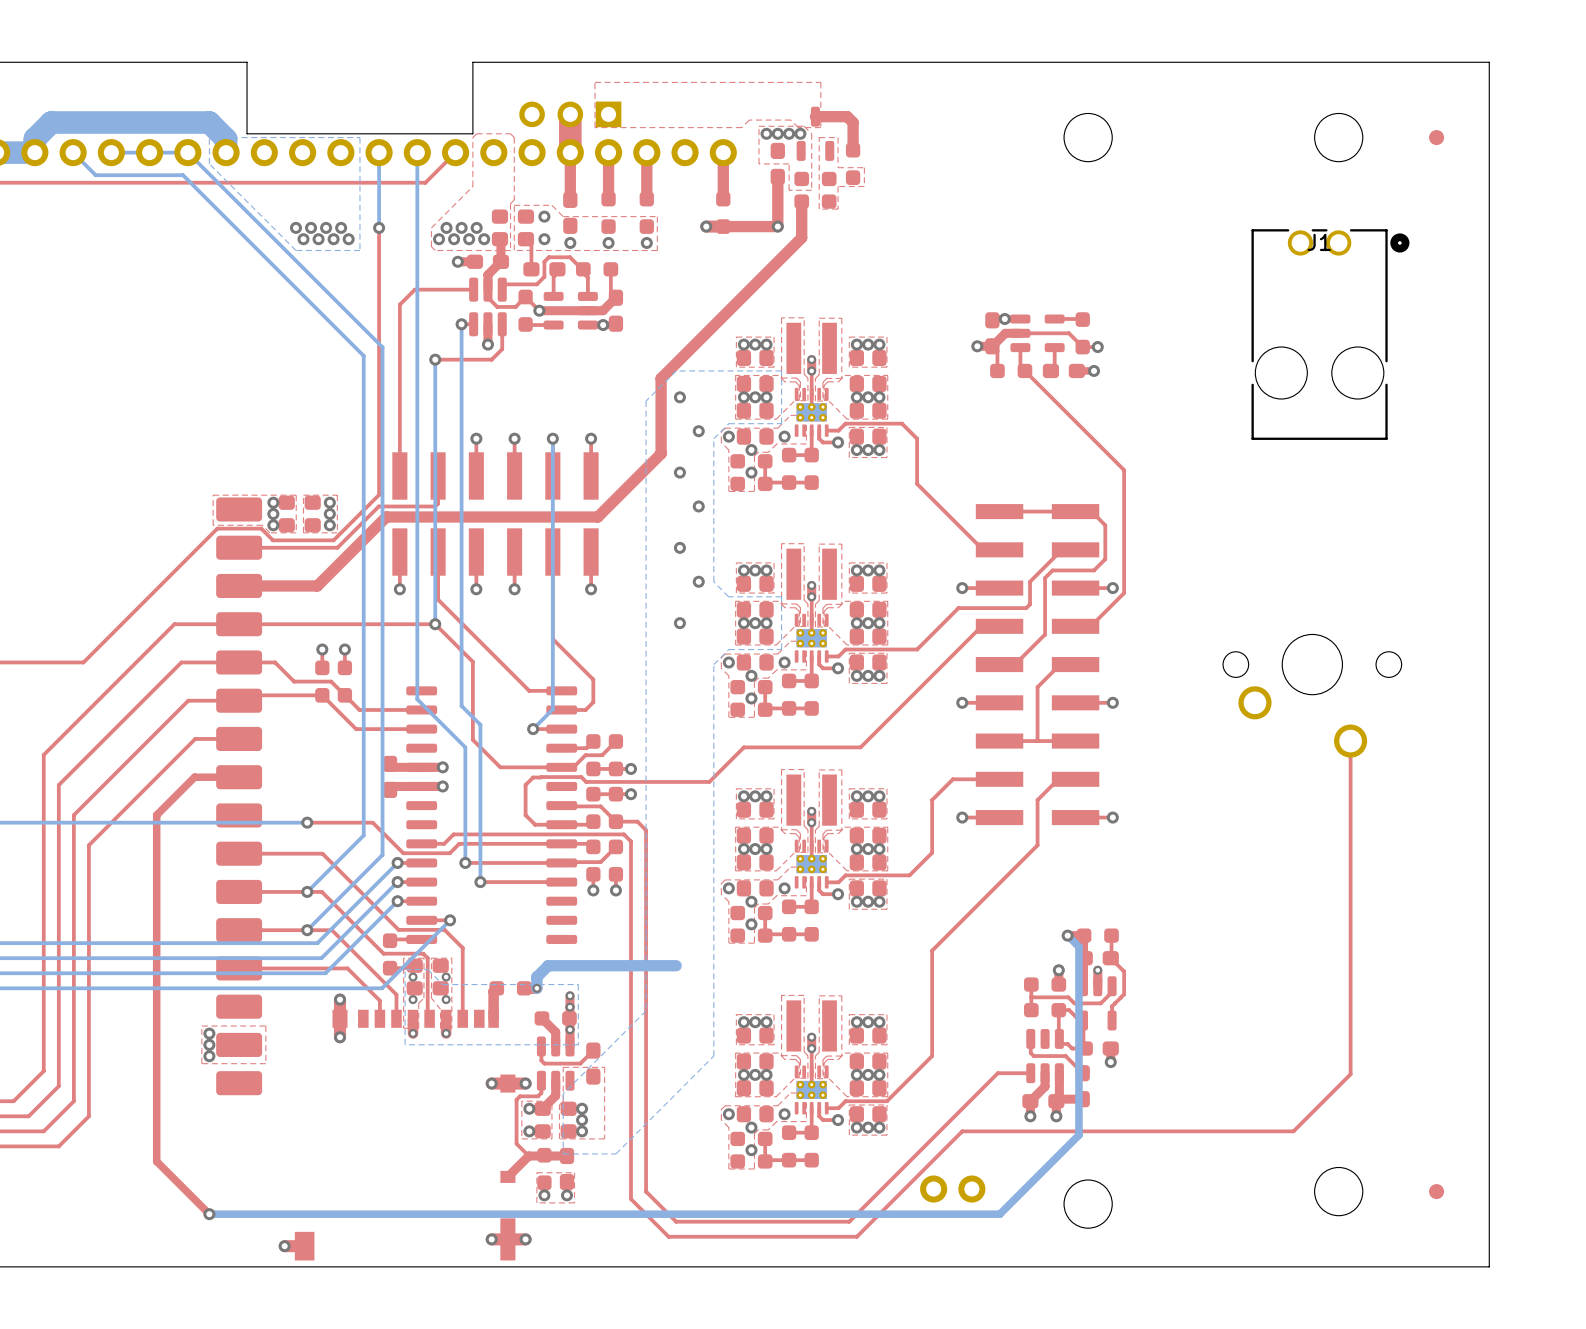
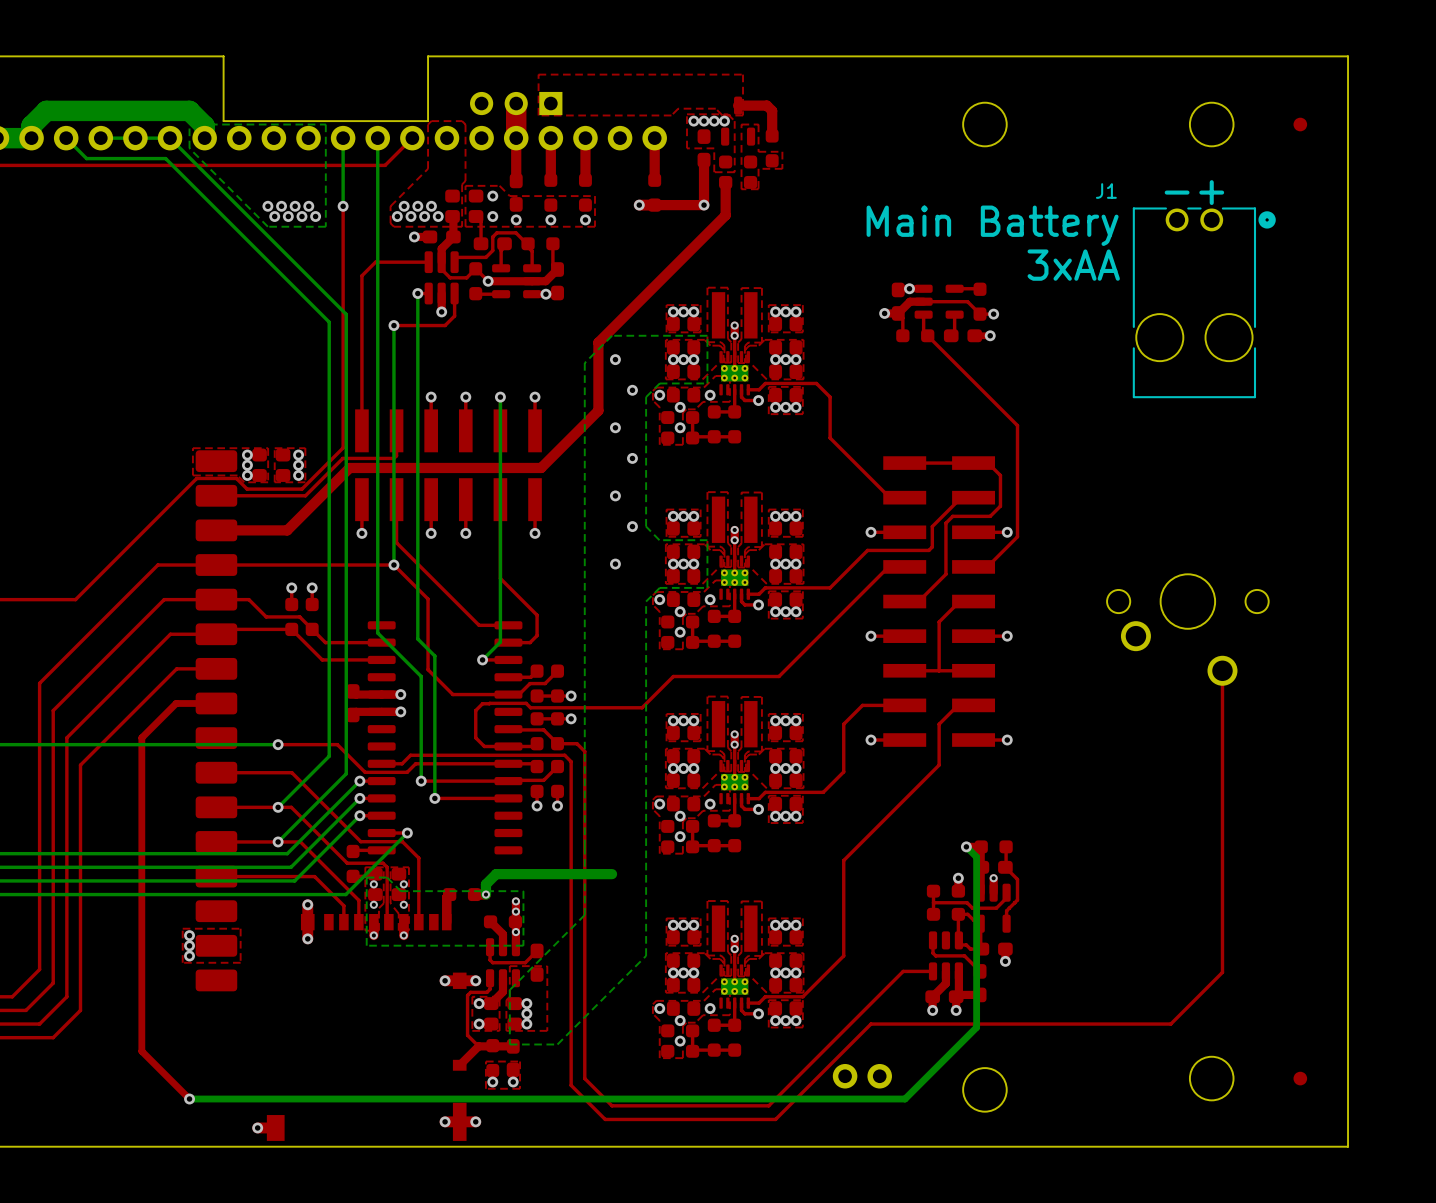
text: none -> - (1177, 192)
text: none -> + (1211, 192)
J1 name position: J1 (1319, 242) -> J1 (1106, 190)
text: none -> Main Battery (992, 225)
text: none -> 3xAA (1073, 265)

